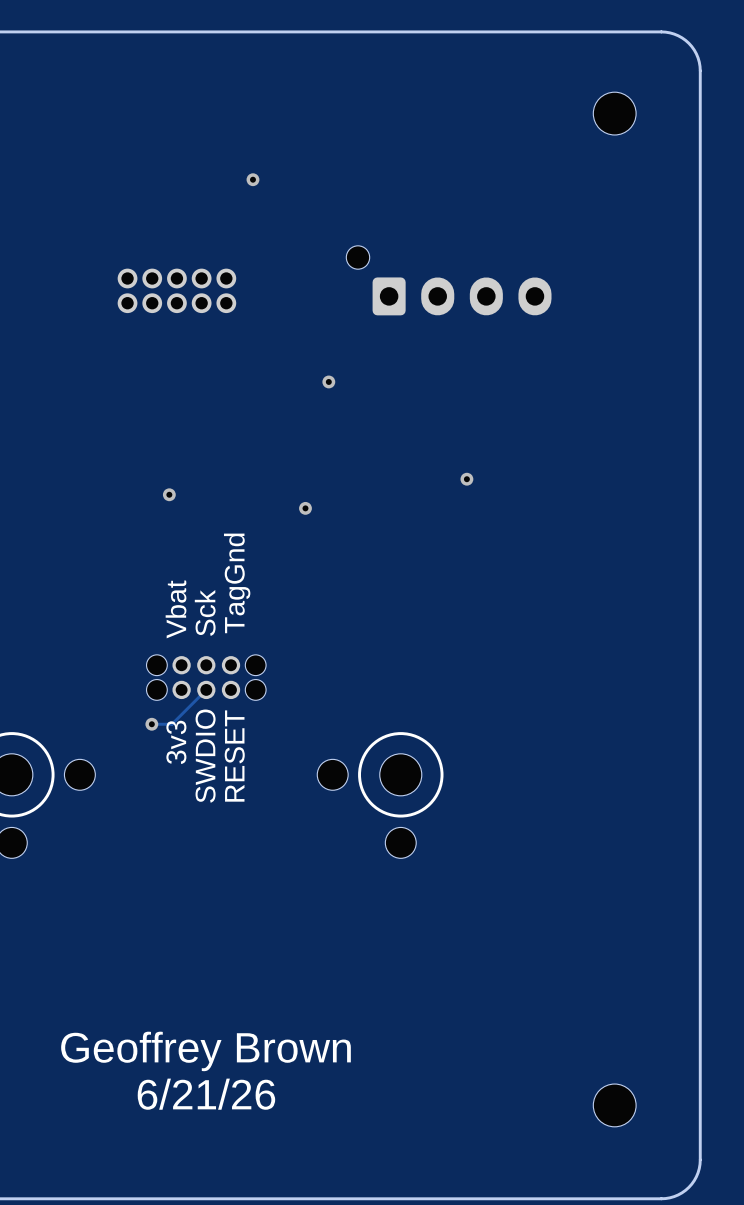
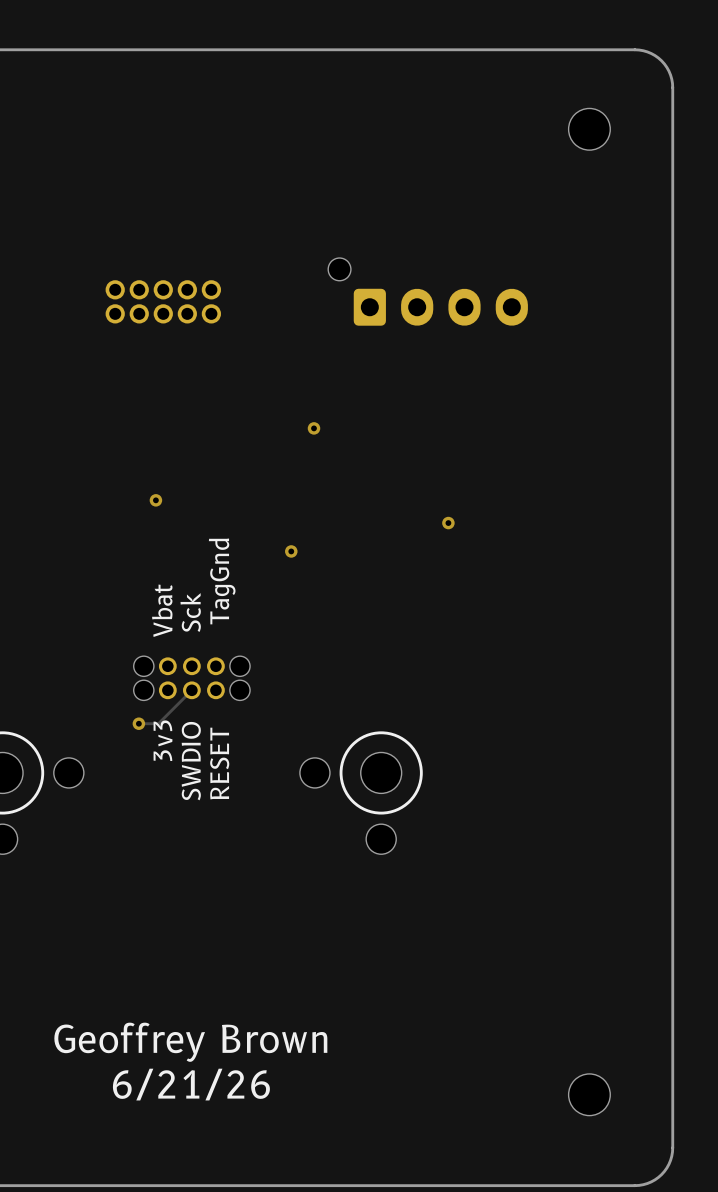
via: (252, 179) -> none
via position: (328, 381) -> (313, 428)
via position: (466, 479) -> (448, 523)
via position: (305, 508) -> (291, 551)

